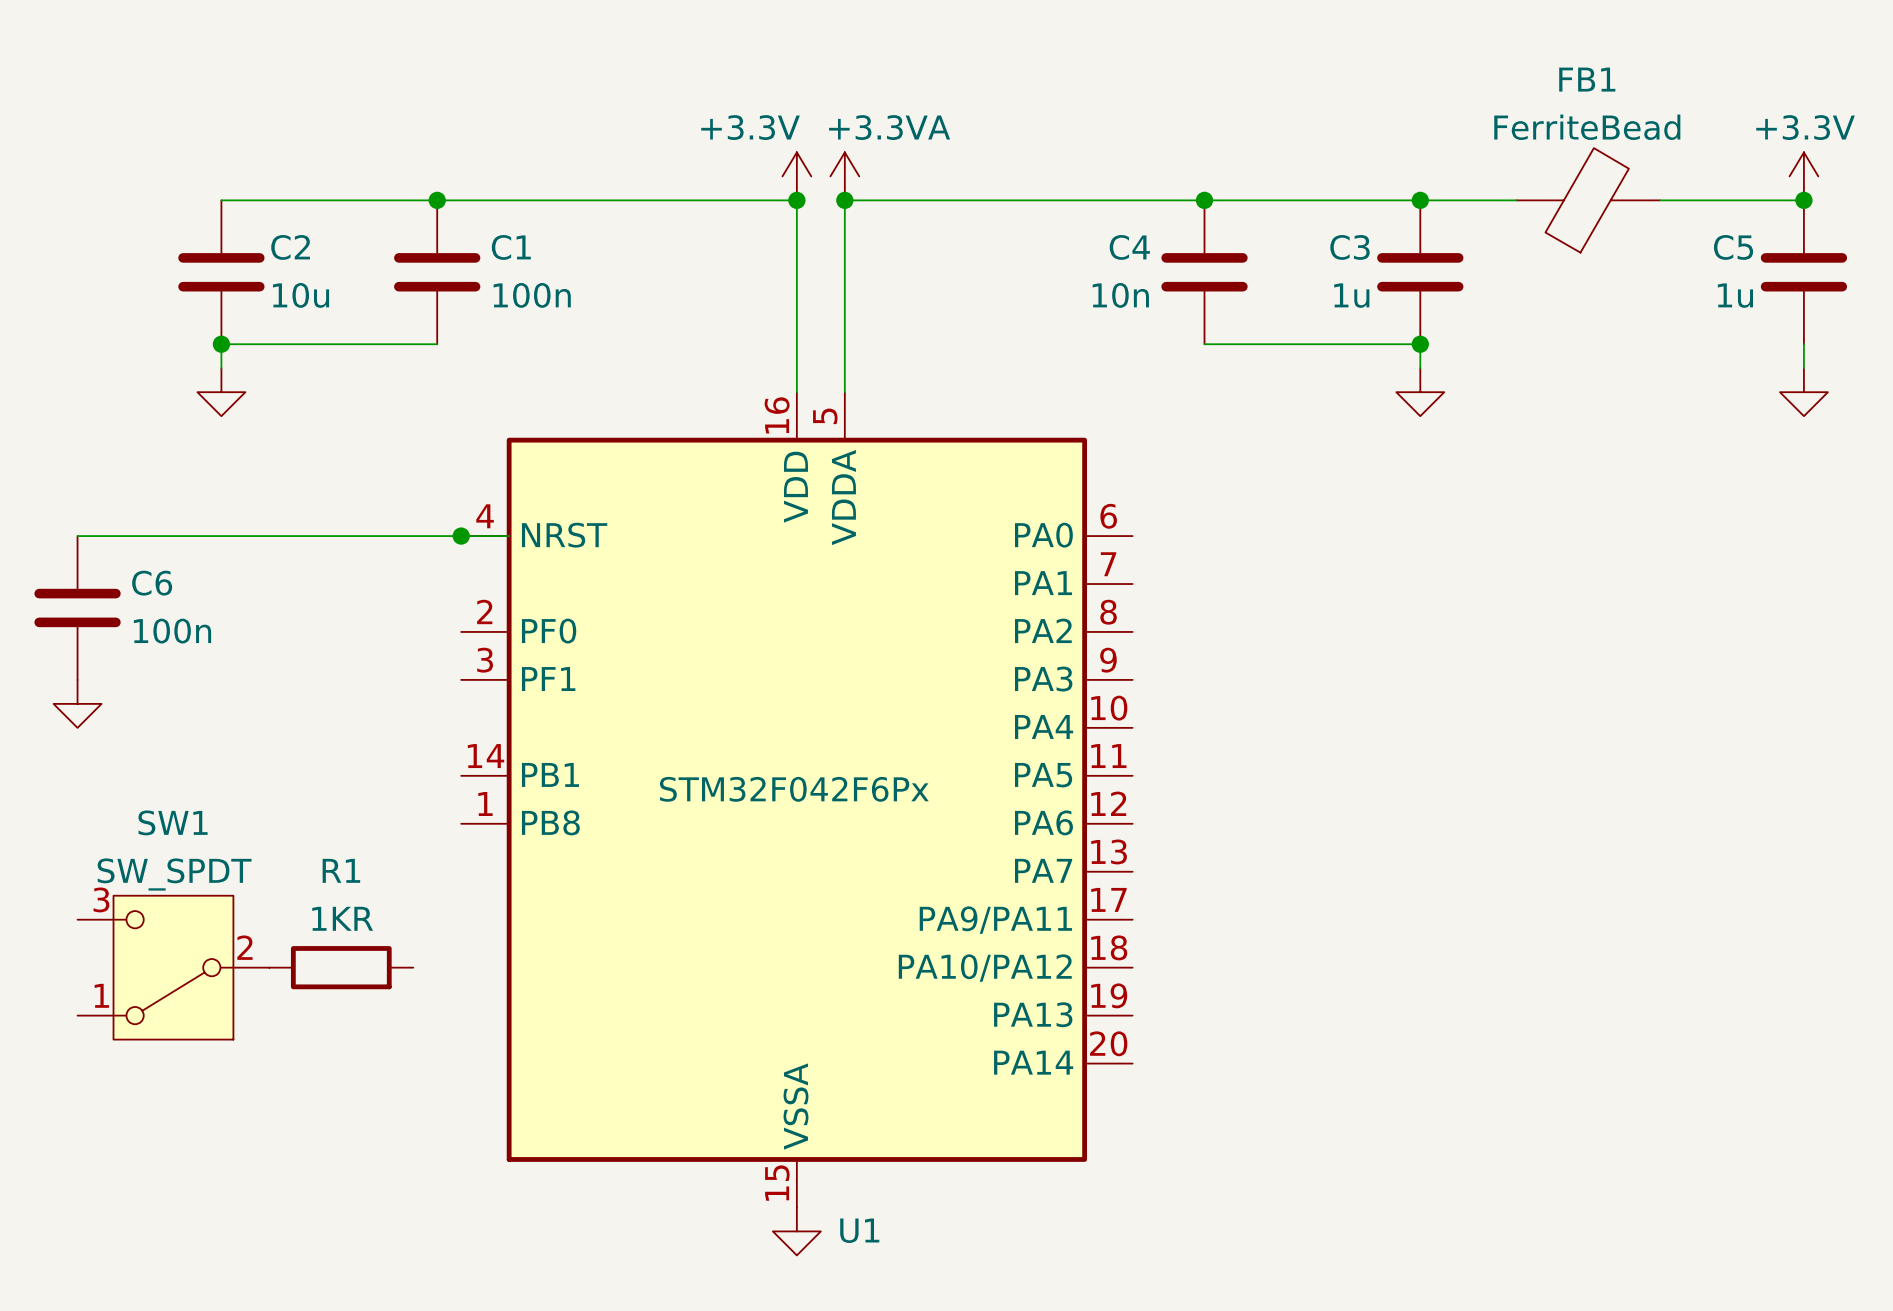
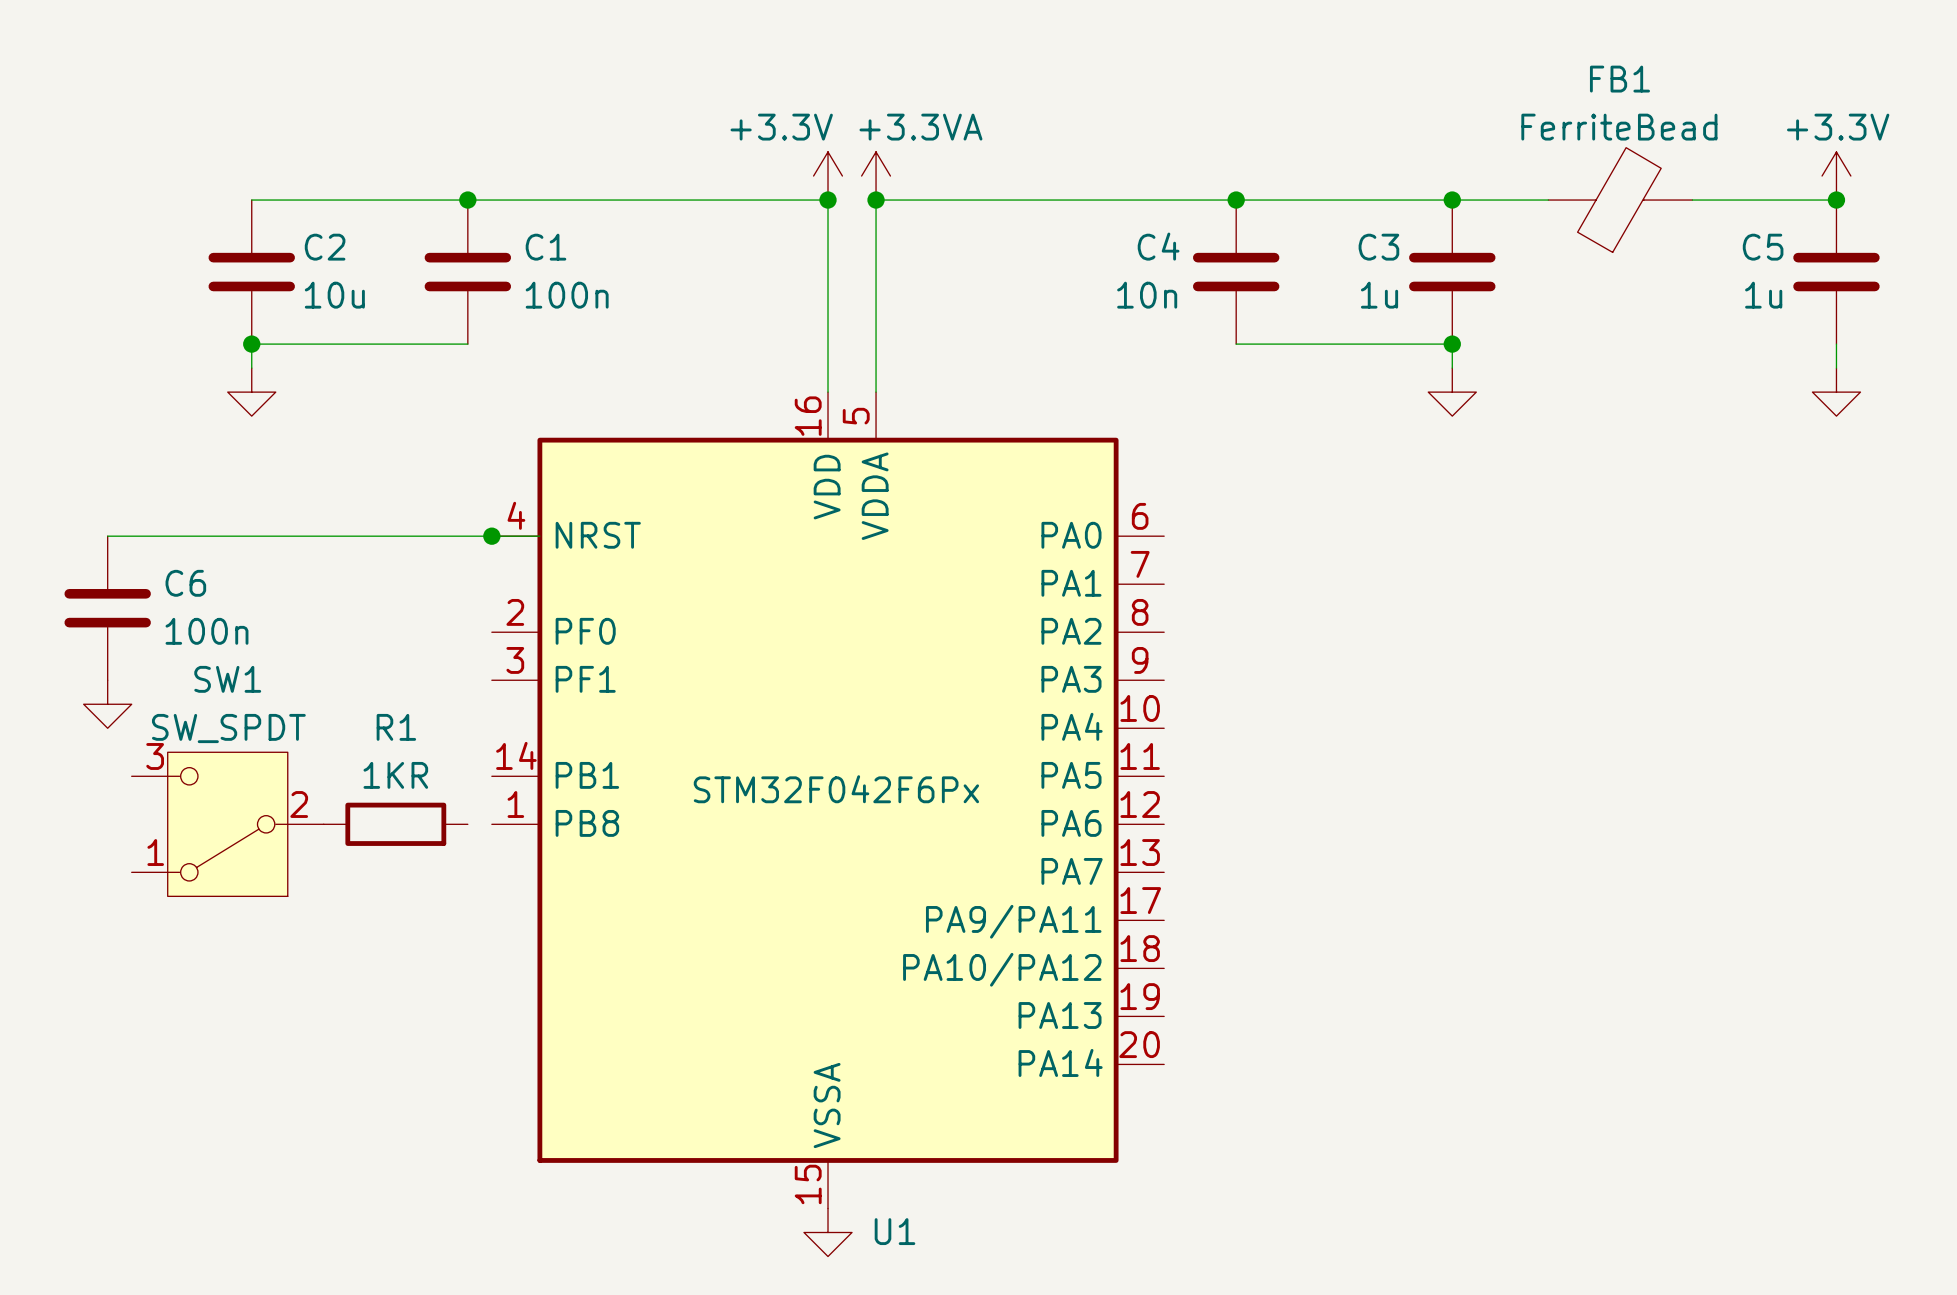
SW1 position: (173, 967) -> (227, 824)
R1 position: (341, 967) -> (395, 824)

